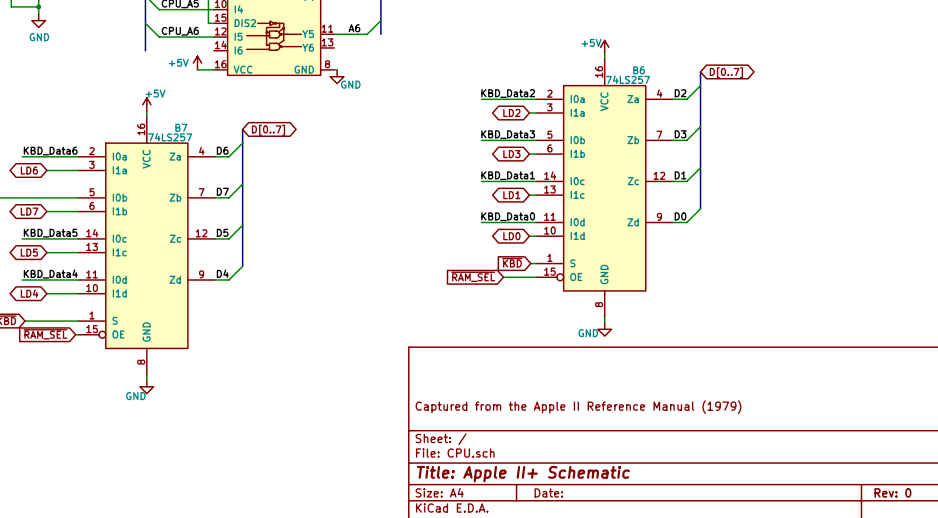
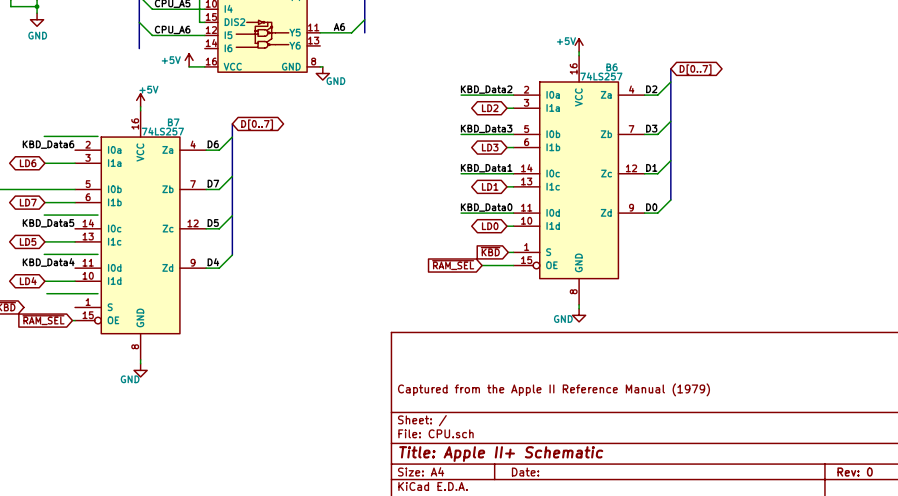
wire: (22, 156) (78, 156) -> (44, 136) (98, 136)
wire: (22, 238) (78, 238) -> (44, 215) (98, 215)
wire: (22, 280) (78, 280) -> (44, 254) (98, 254)
wire: (25, 321) (78, 321) -> (46, 293) (98, 293)

